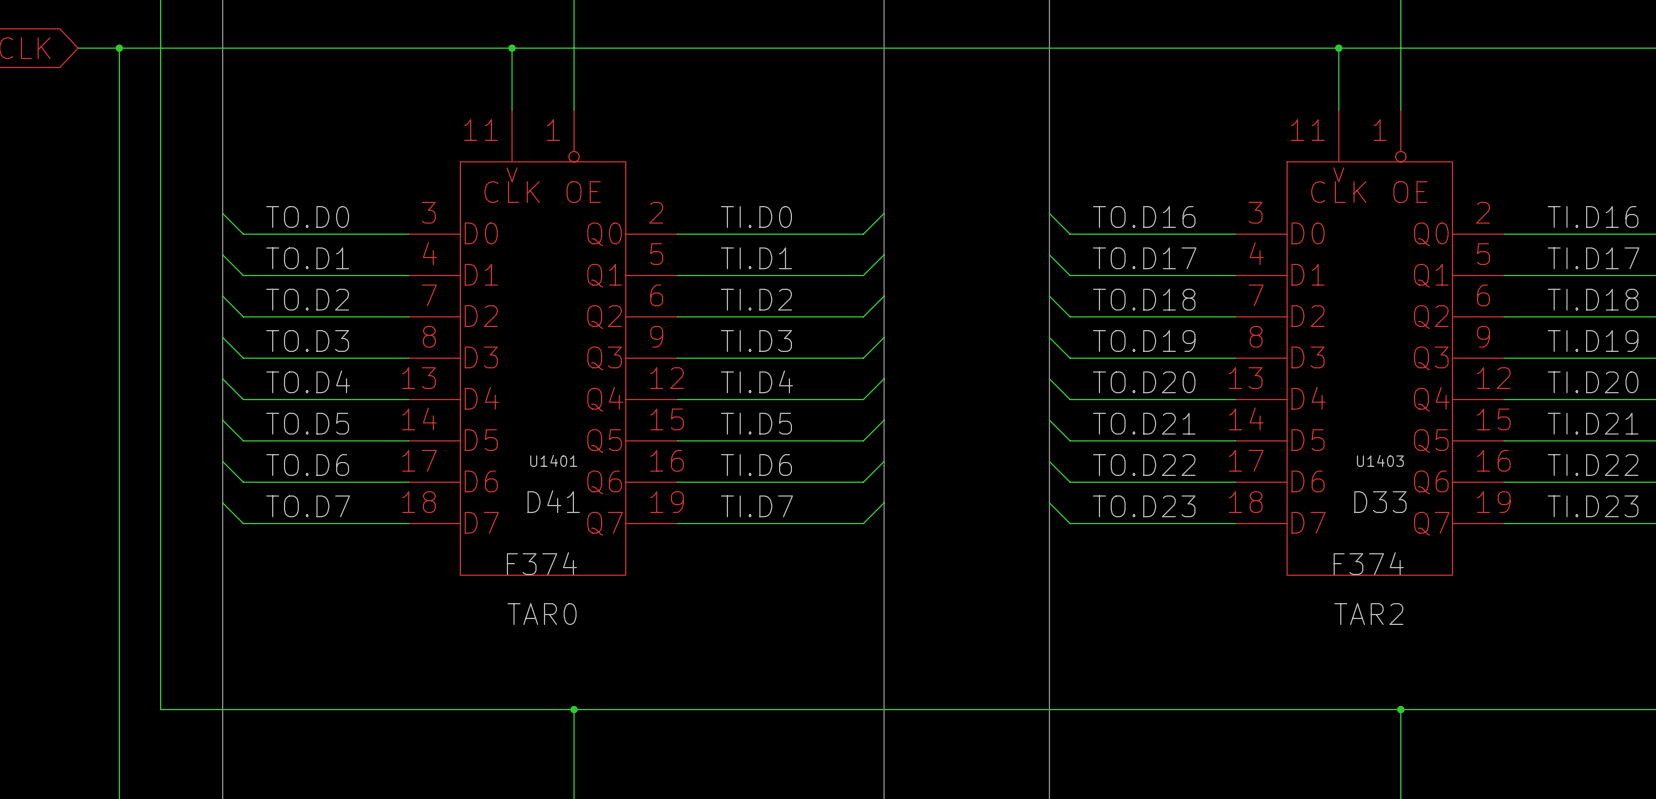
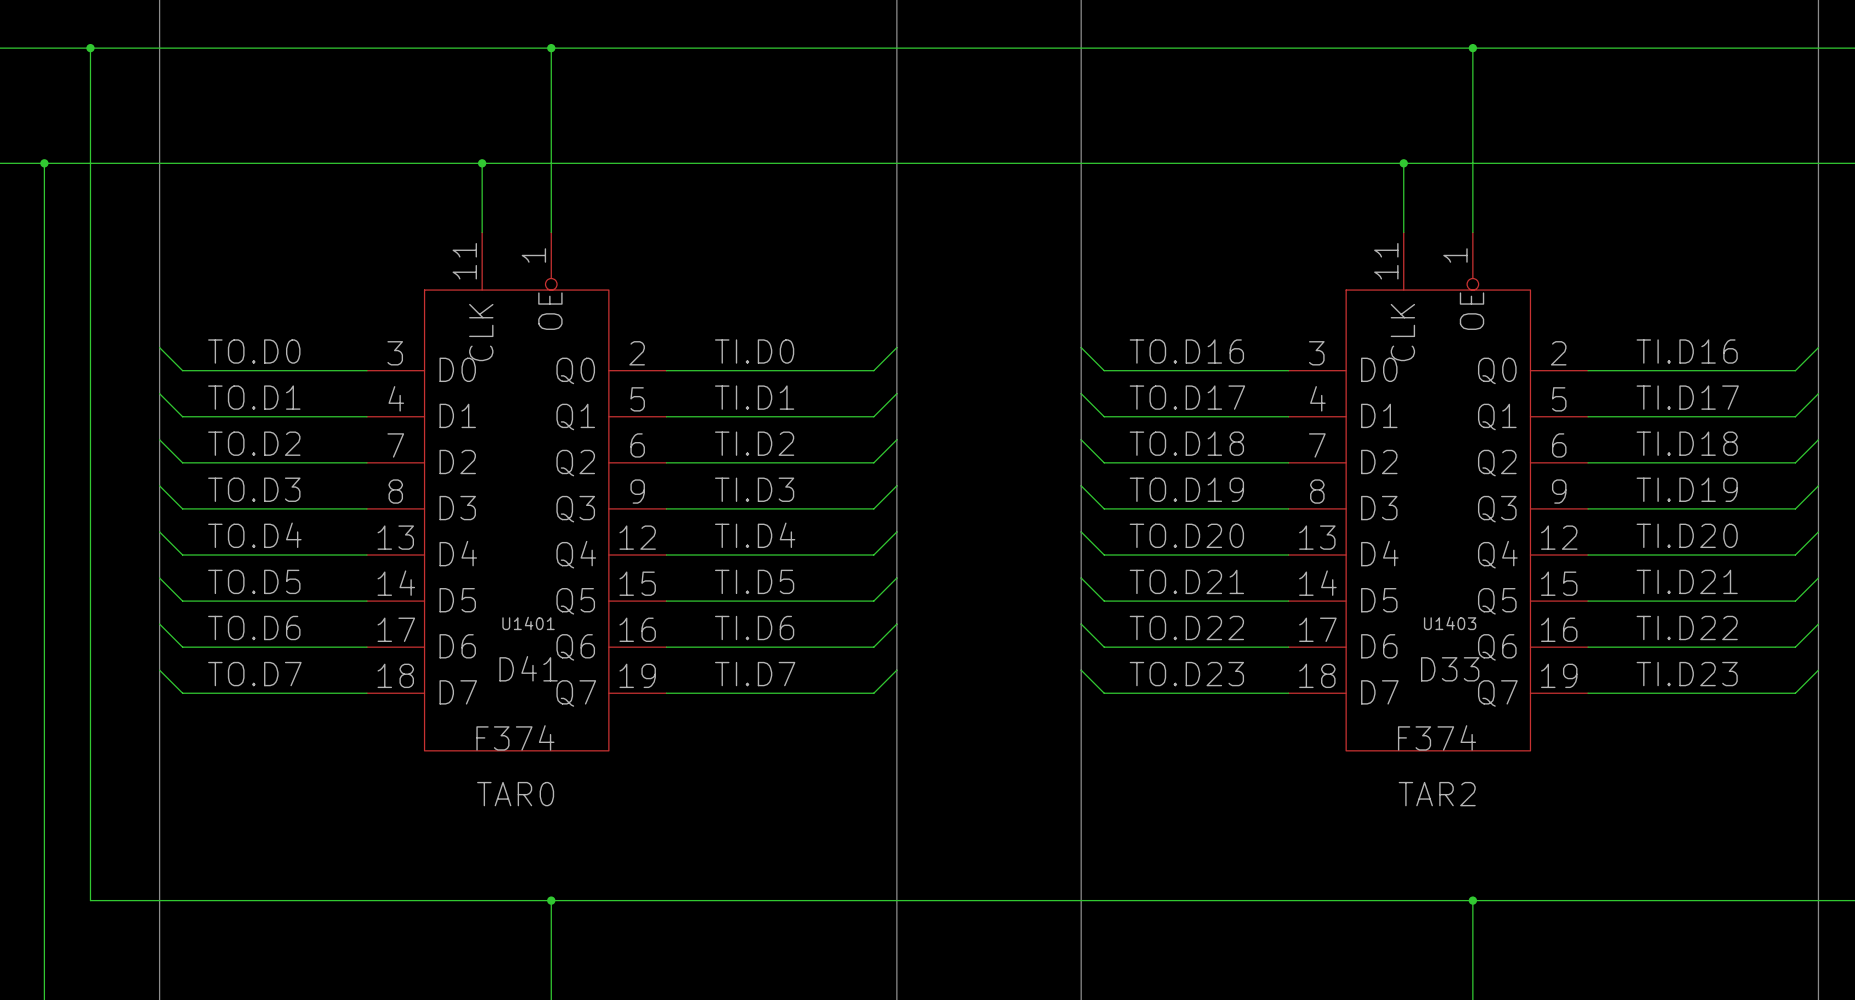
U1401 symbol: [408, 110, 678, 576] -> [366, 232, 667, 751]
U1403 symbol: [1235, 110, 1505, 576] -> [1288, 232, 1589, 751]

